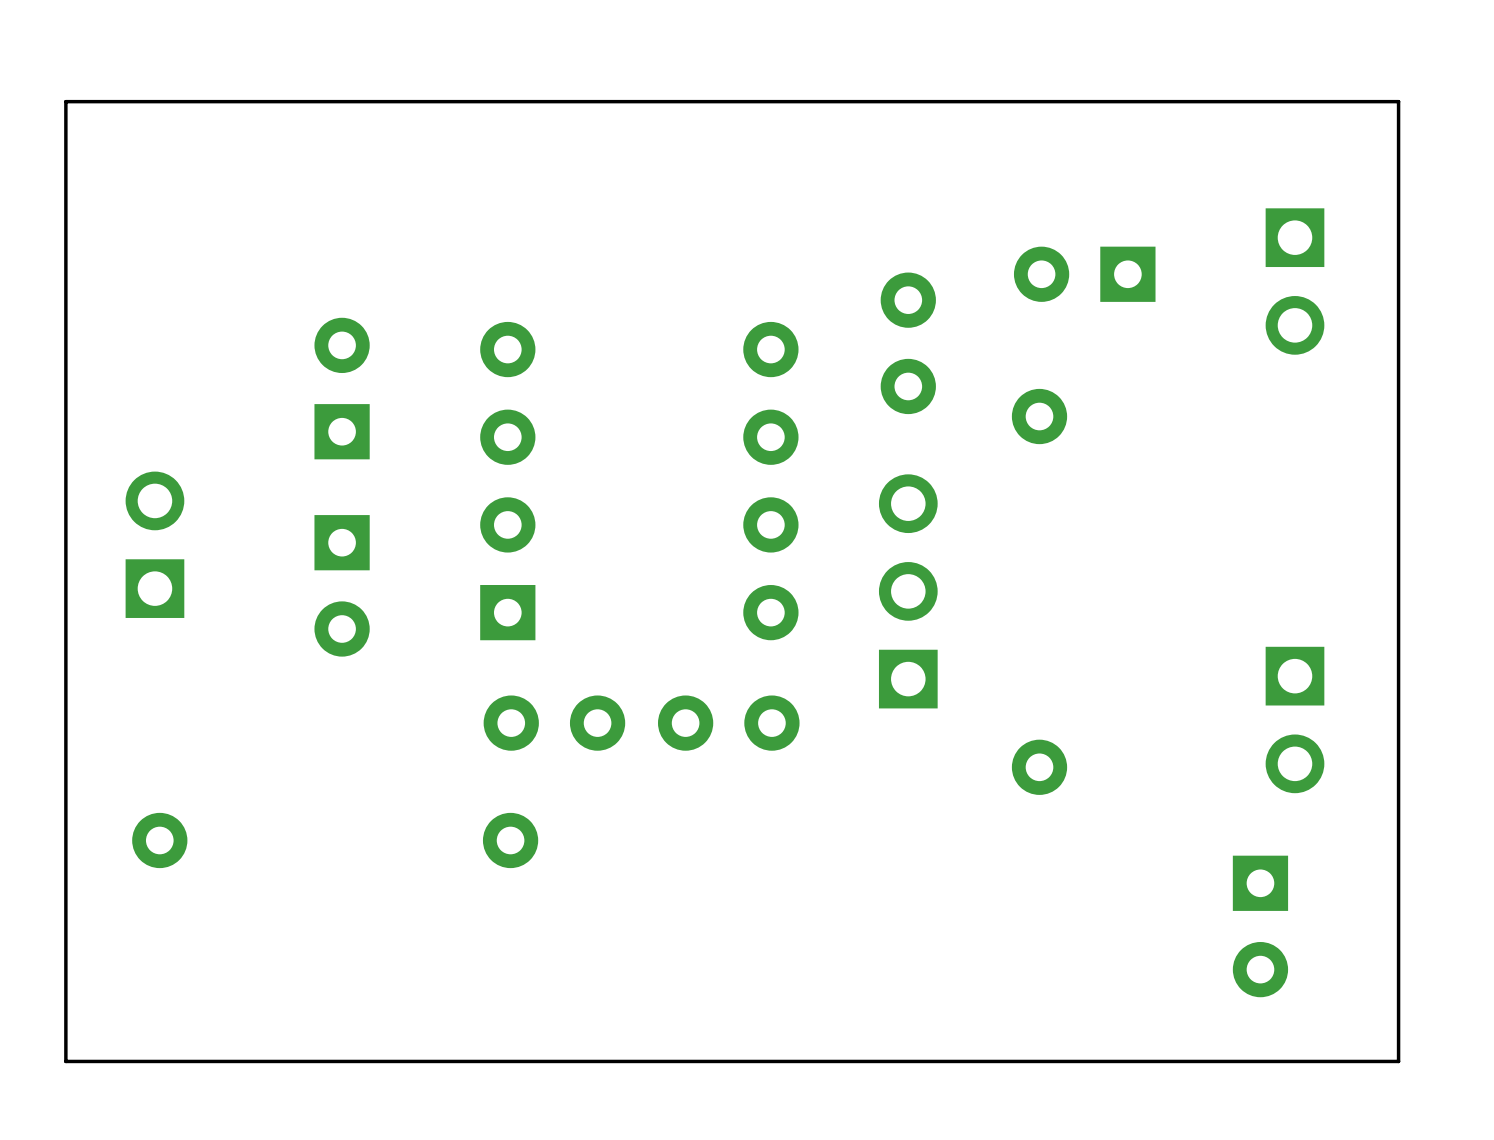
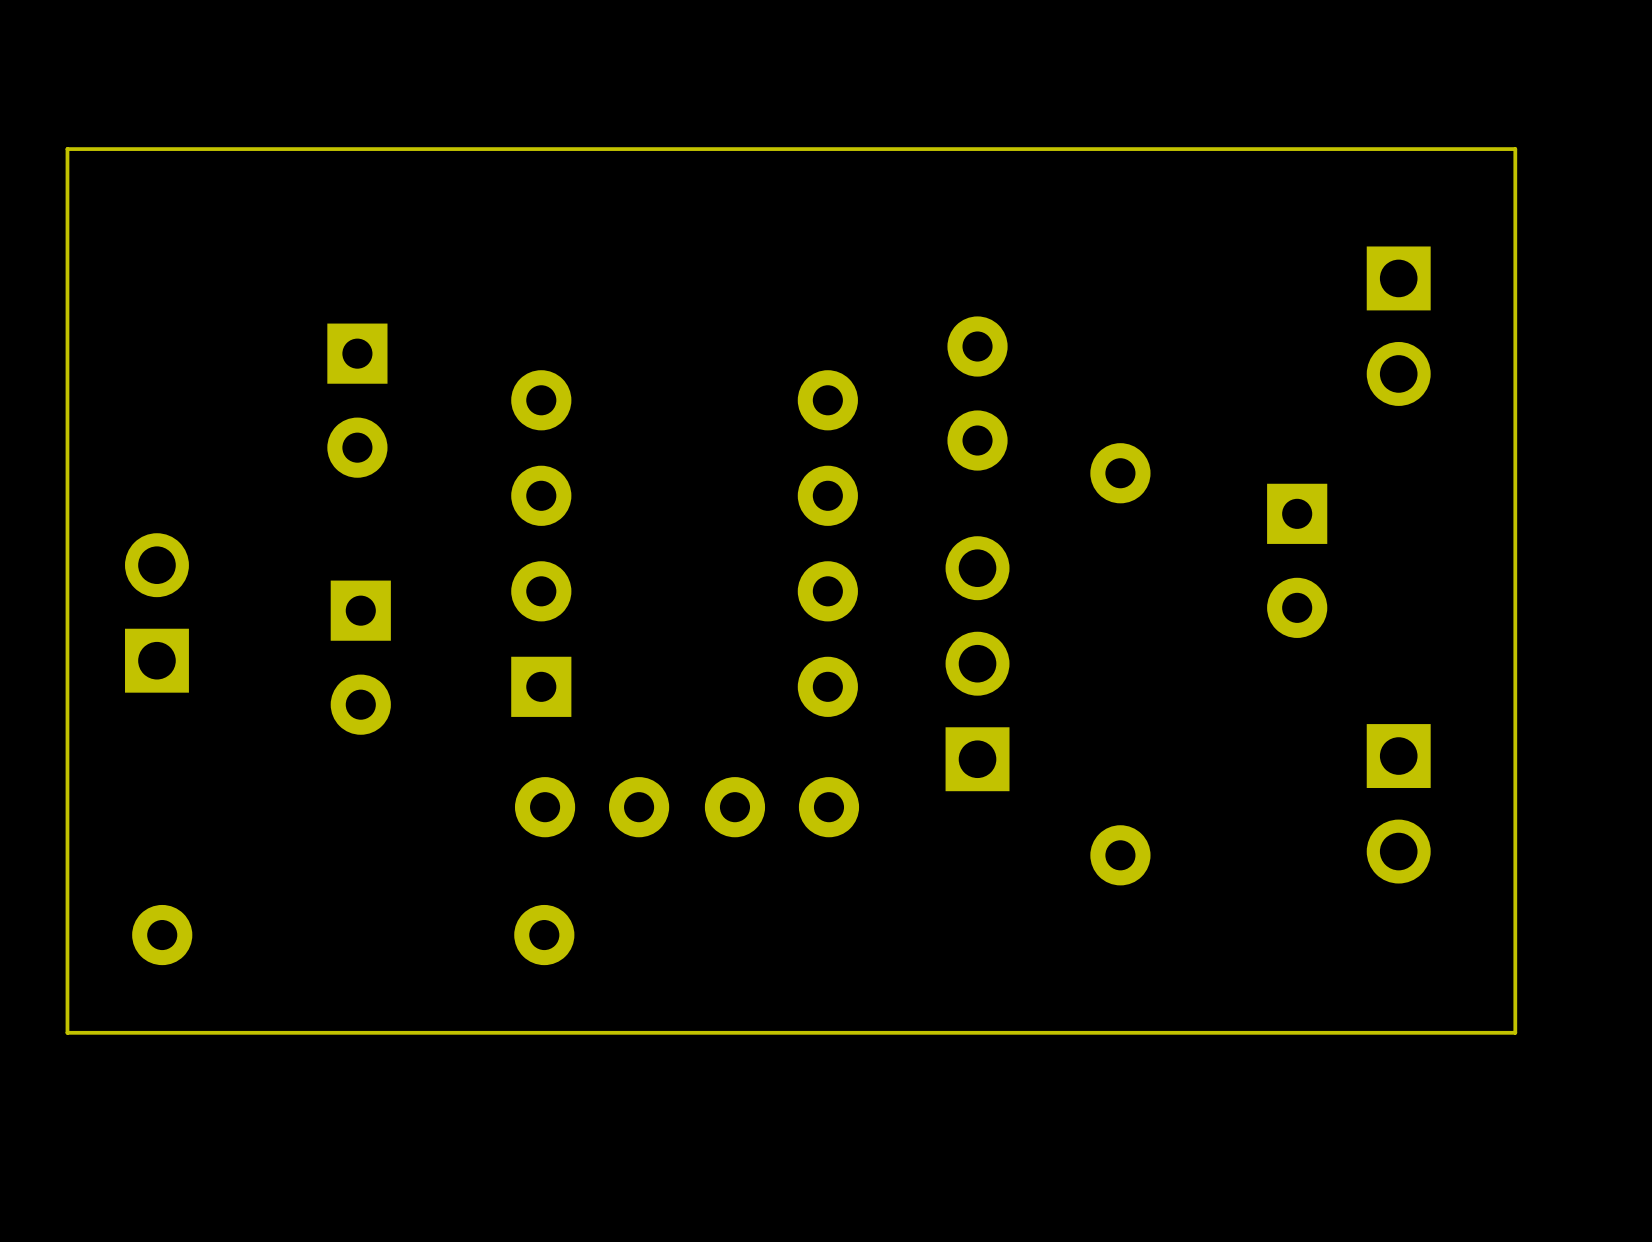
board edge: (1398, 101) (65, 101) (65, 1061) (1398, 1061) (1398, 101) -> (1515, 149) (1515, 1032) (67, 1032) (67, 149) (1515, 149)
part: (1084, 274) -> none
part rotation: 0° (342, 388) -> 180° (357, 400)
part: none -> (1297, 560)
part: (1260, 926) -> none

